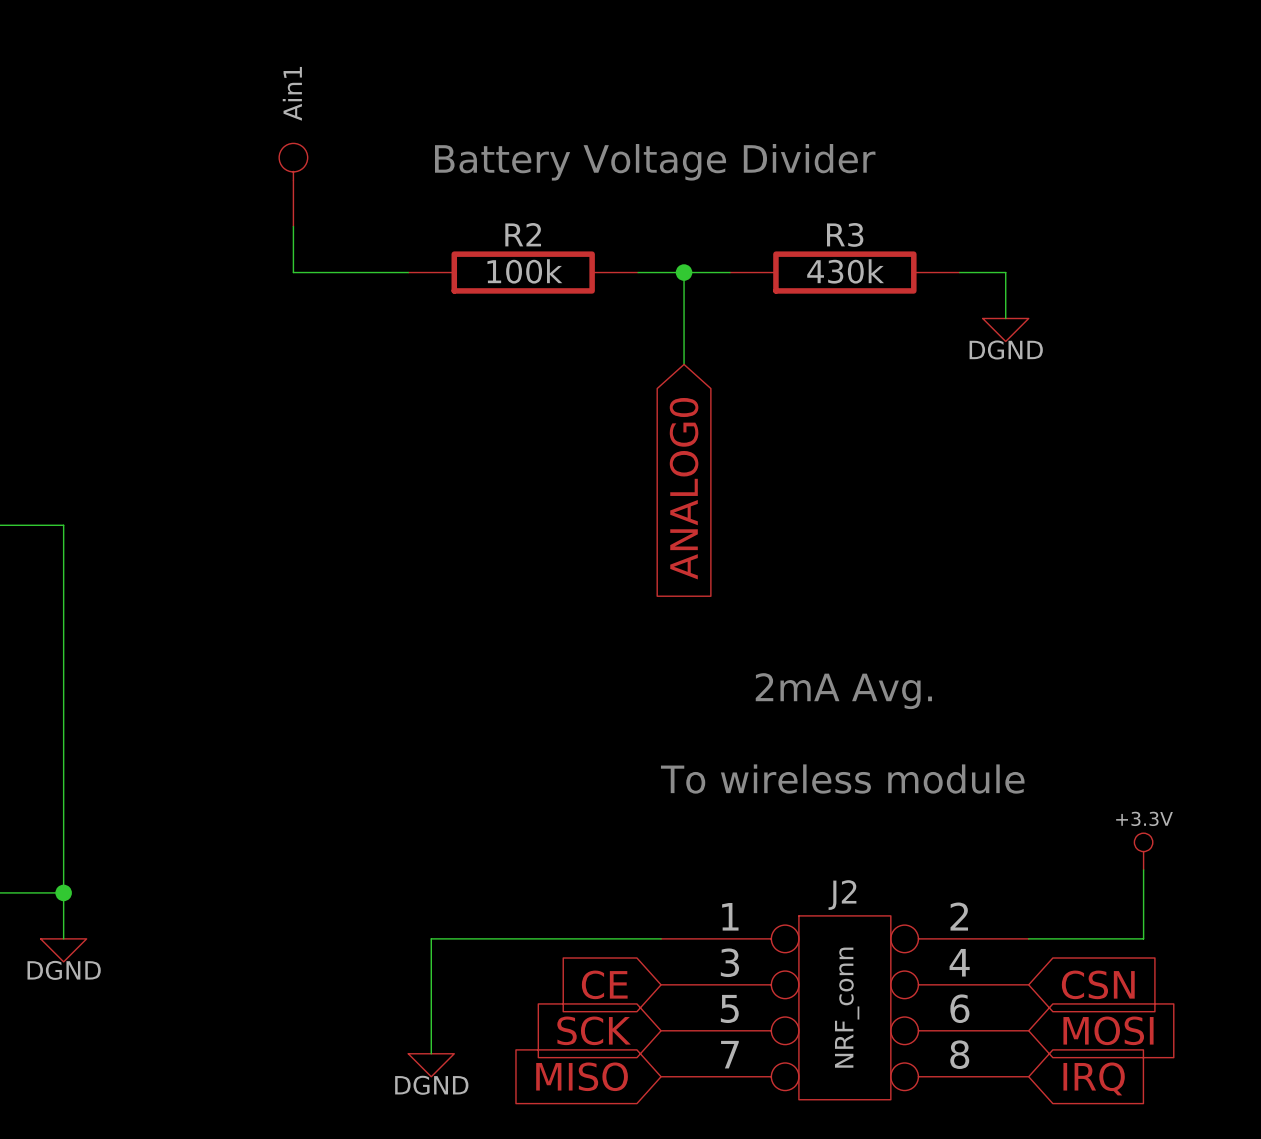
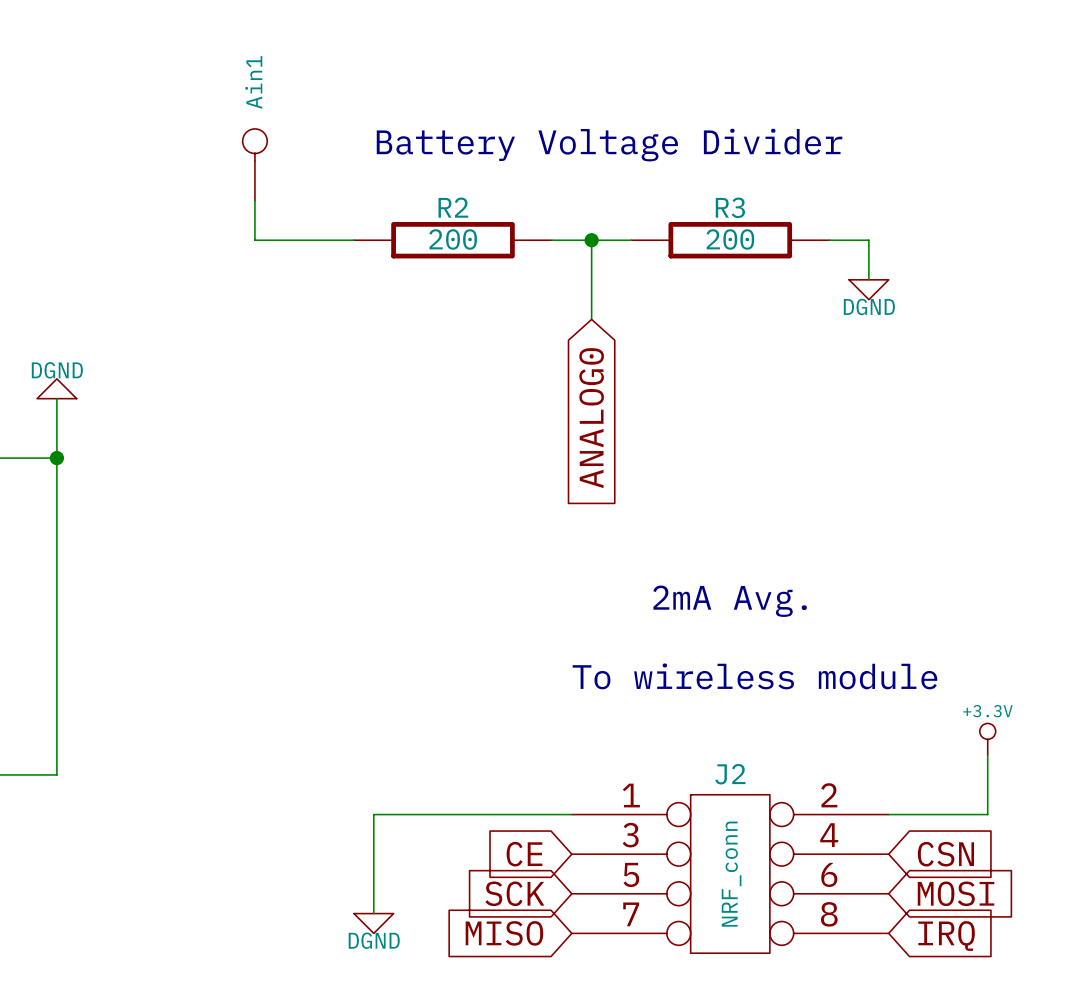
R2 value: 100k (524, 271) -> 200 (453, 239)
R3 value: 430k (845, 271) -> 200 (730, 239)
power symbol: none -> DGND (56, 388)
wire: none -> (56, 398) (56, 458)
junction: none -> (56, 458)
wire: (63, 892) (63, 938) -> none
junction: (63, 892) -> none
power symbol: DGND (63, 950) -> none

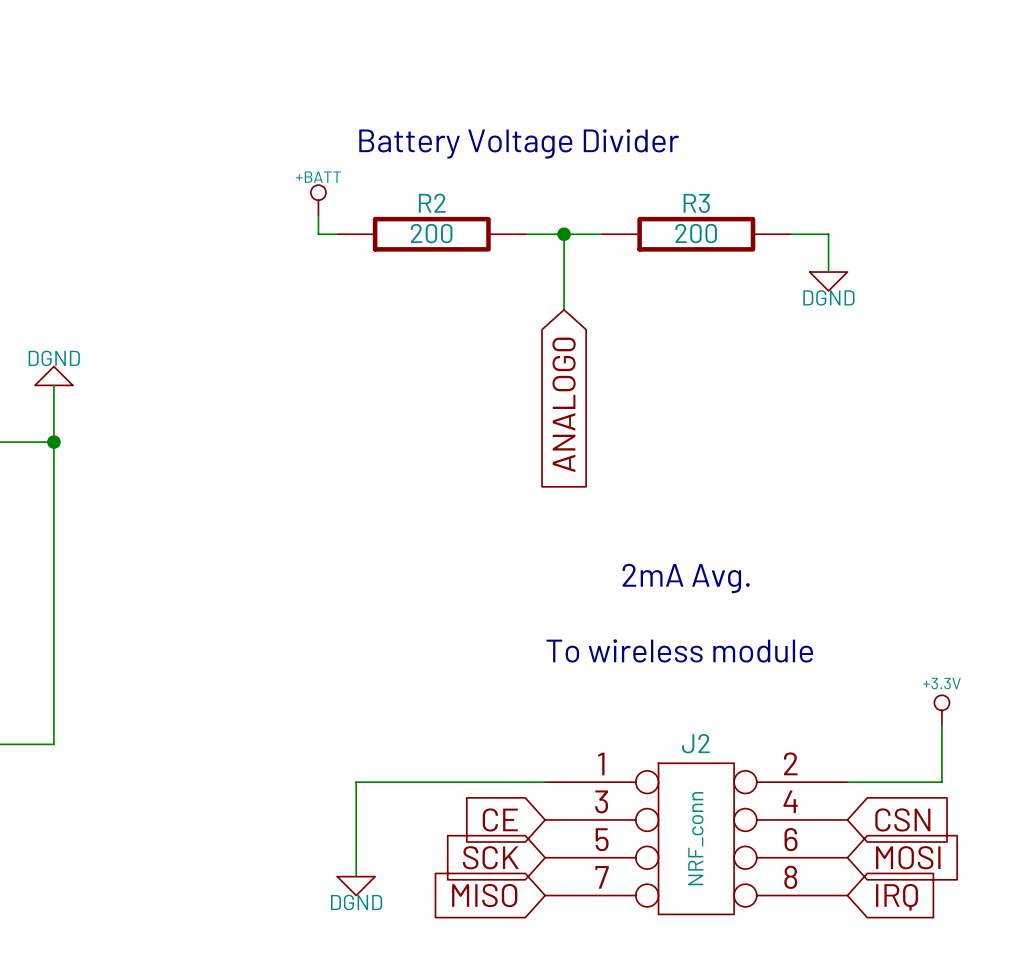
Ain1: (254, 164) -> none
wire: (254, 200) (254, 240) (334, 240) -> (318, 215) (318, 234)
power symbol: none -> +BATT (318, 200)

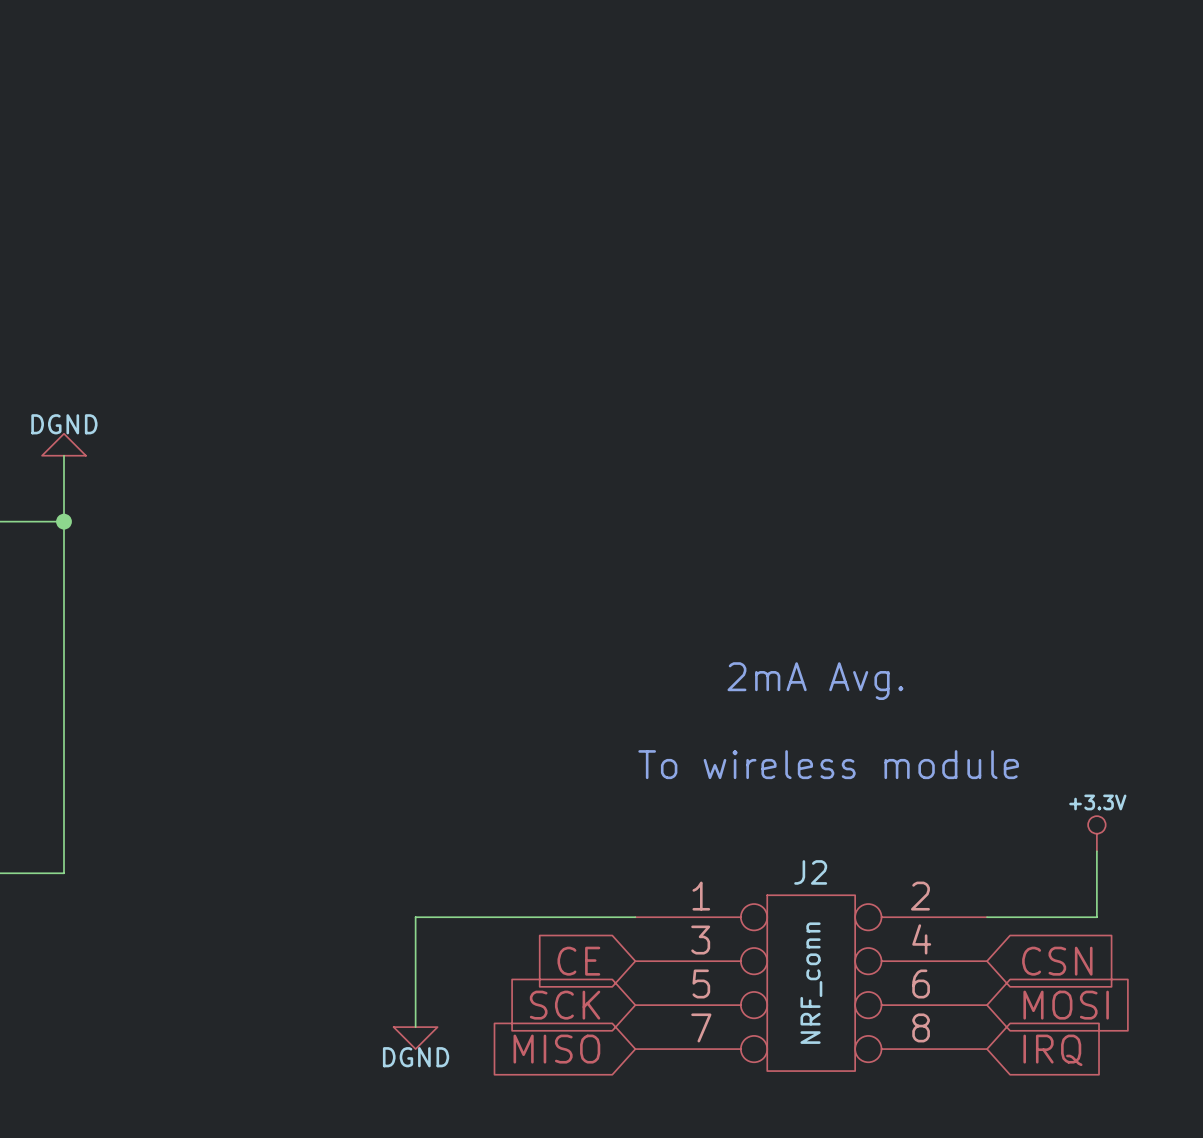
text: Battery Voltage Divider (519, 143) -> none
power symbol: +BATT (318, 200) -> none
wire: (318, 215) (318, 234) (337, 234) -> none
R2: 200 (431, 234) -> none
wire: (526, 234) (601, 234) -> none
wire: (564, 234) (564, 309) -> none
junction: (564, 234) -> none
R3: 200 (696, 234) -> none
wire: (790, 234) (828, 234) (828, 272) -> none
power symbol: DGND (828, 281) -> none
global label: ANALOG0 (564, 404) -> none

